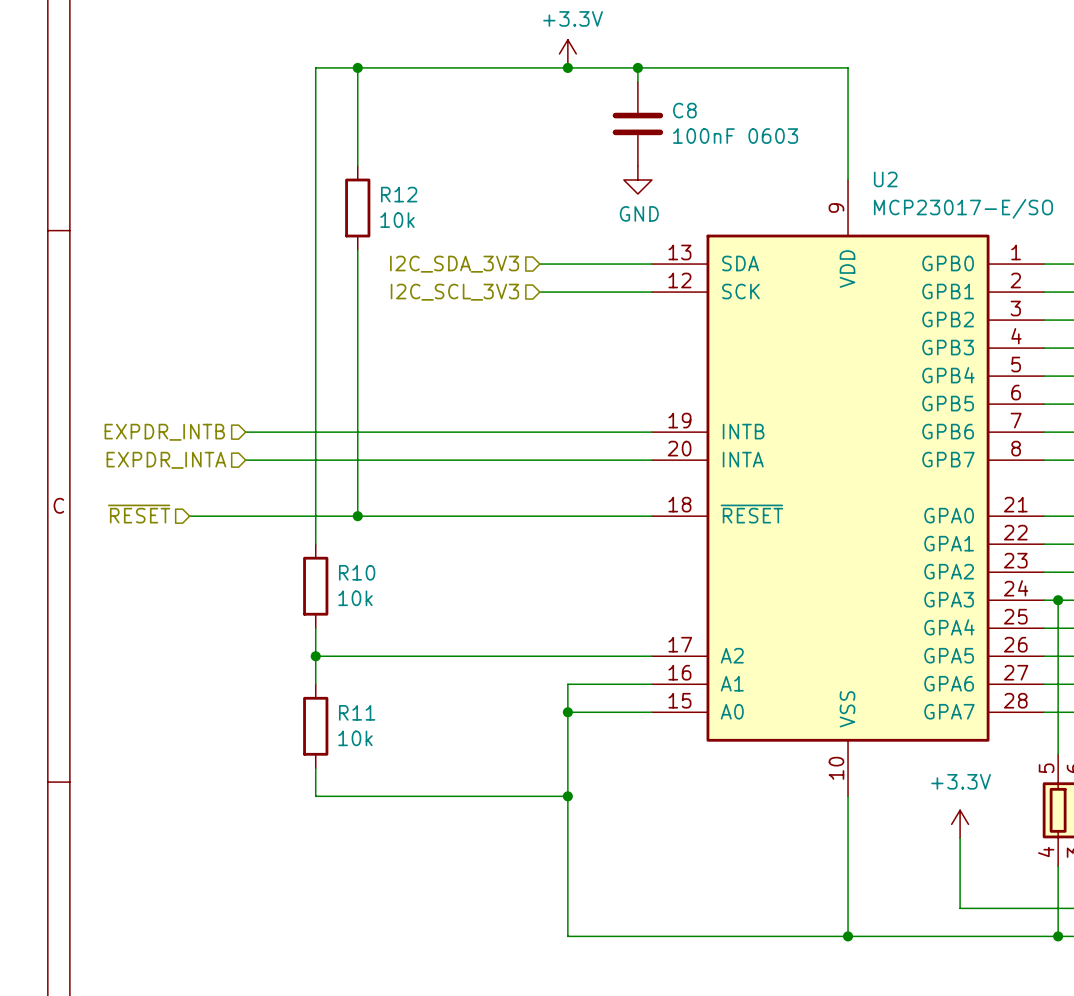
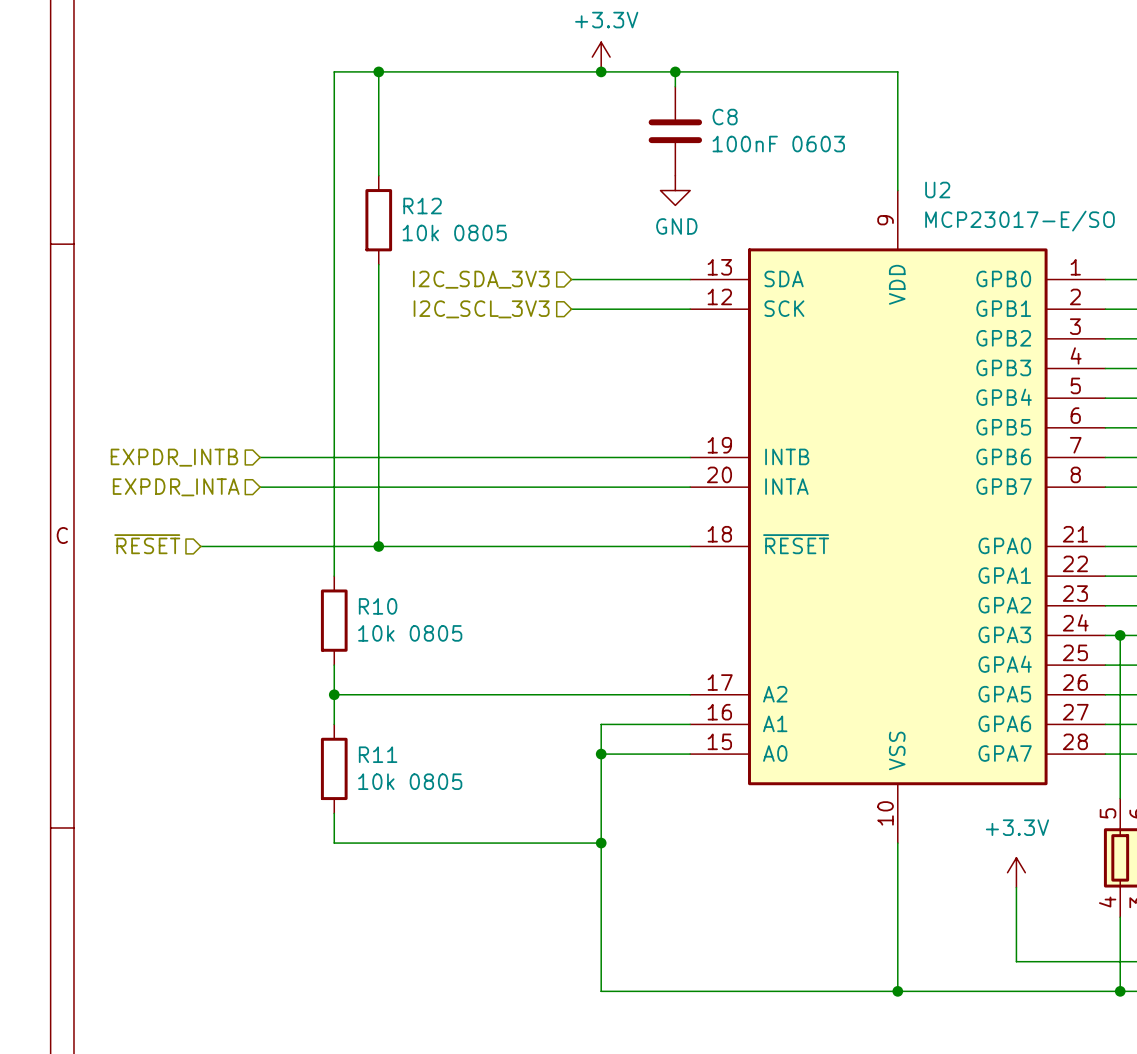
R12 value: 10k (397, 220) -> 10k 0805 (454, 233)
R10 value: 10k (355, 598) -> 10k 0805 (410, 633)
R11 value: 10k (355, 738) -> 10k 0805 (410, 781)

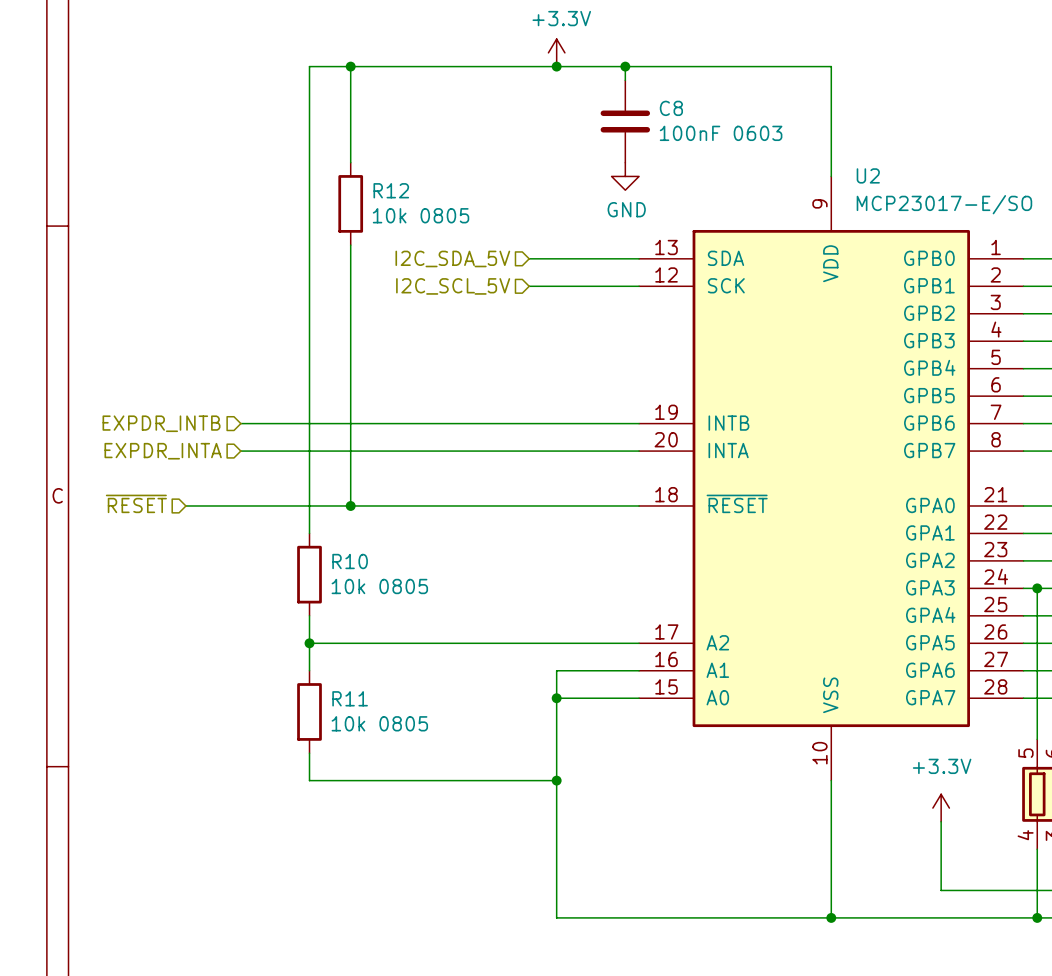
hierarchical label: I2C_SDA_3V3 (481, 279) -> I2C_SDA_5V (452, 258)
hierarchical label: I2C_SCL_3V3 (481, 309) -> I2C_SCL_5V (453, 286)

